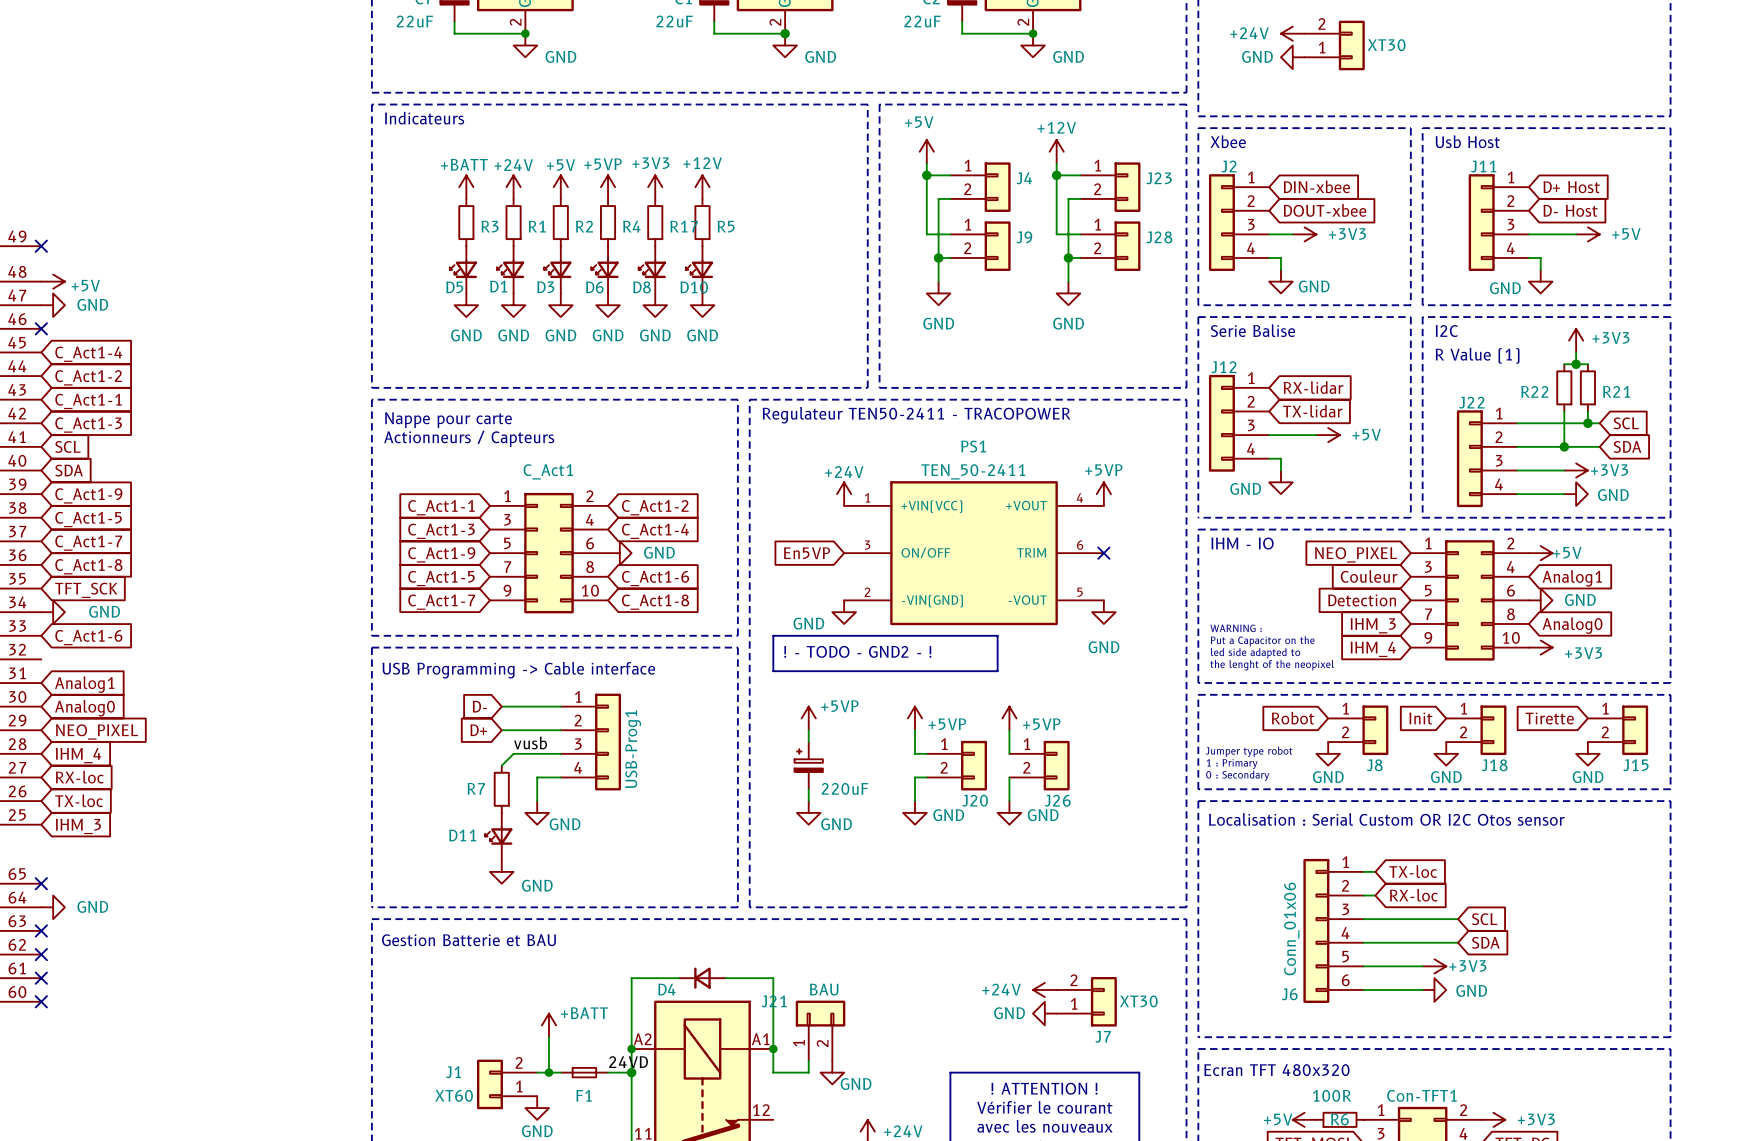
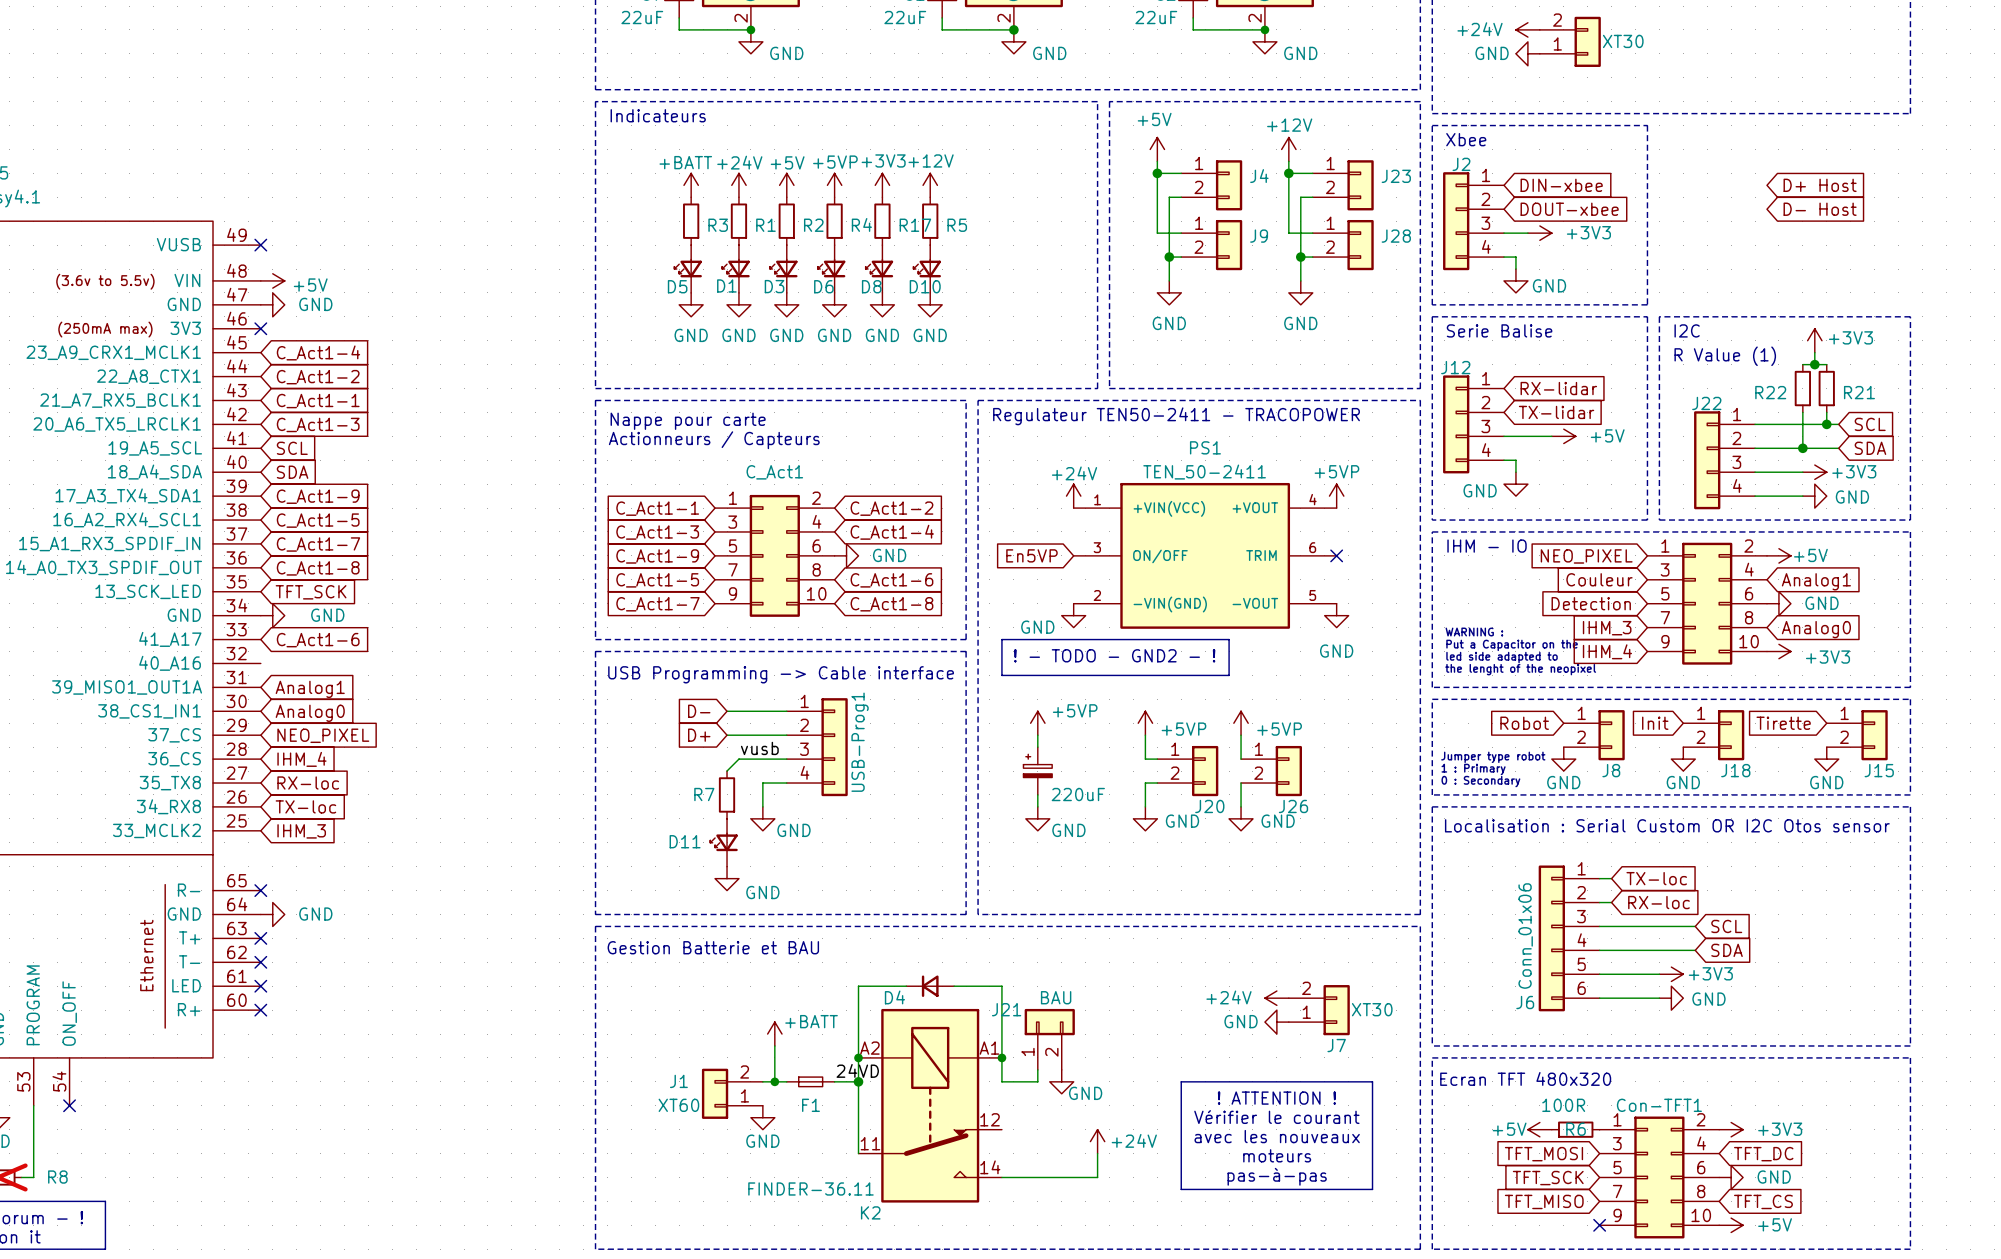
line: (1422, 128) (1670, 128) (1670, 305) (1422, 305) (1422, 128) -> none
text: Usb Host (1467, 141) -> none
J11: (1498, 222) -> none
wire: (1528, 234) (1576, 234) -> none
power symbol: +5V (1587, 234) -> none
wire: (1528, 258) (1540, 258) (1540, 269) -> none
power symbol: GND (1540, 281) -> none

